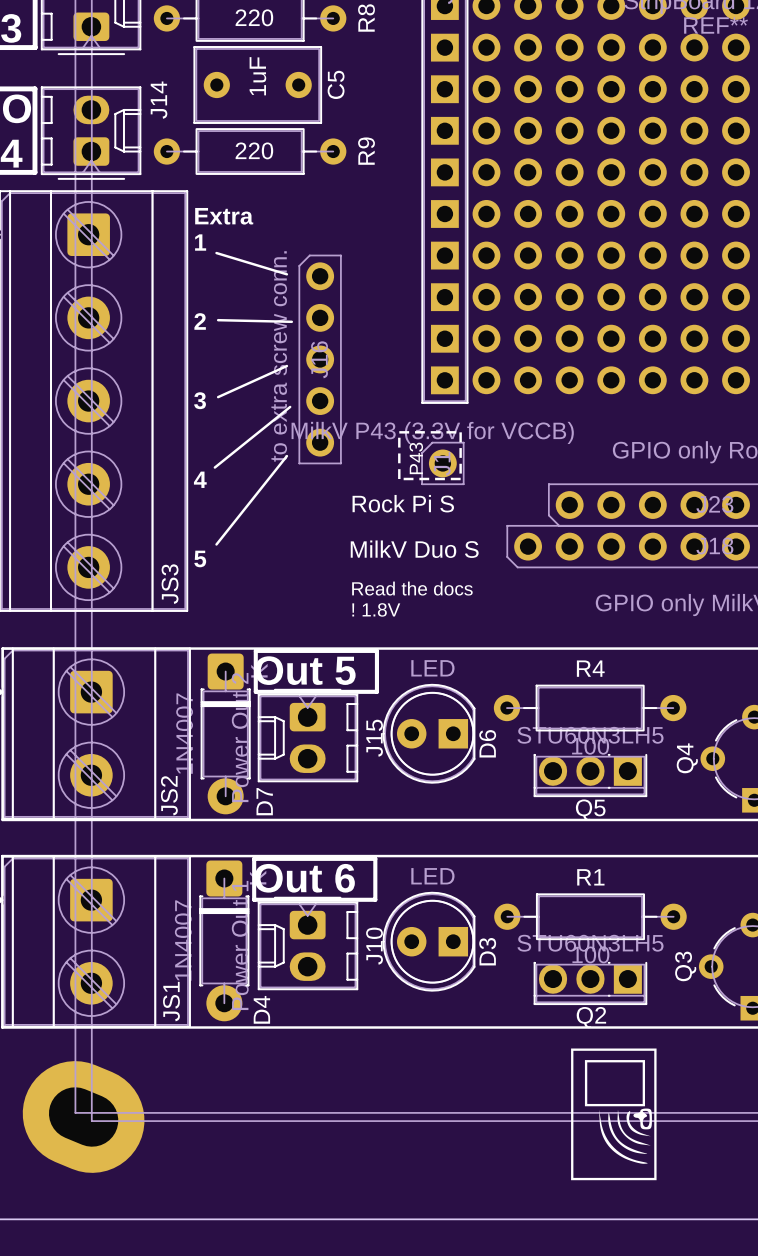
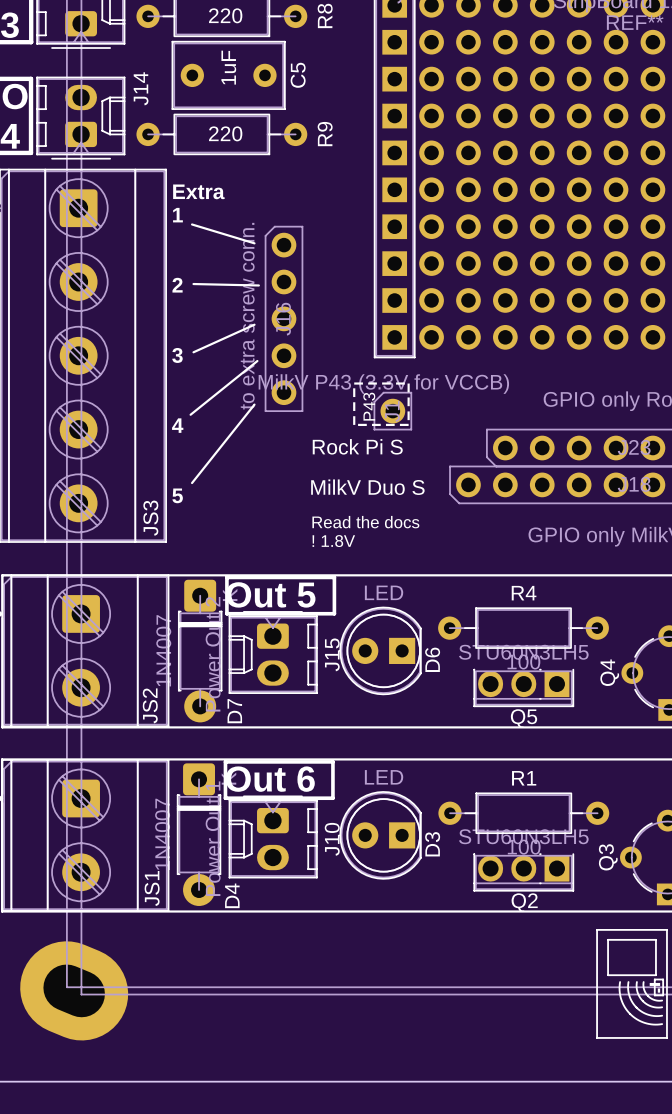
drawing: [571, 1048, 657, 1181] -> none
line: none -> (597, 929) (597, 1037) (666, 1037) (666, 929) (597, 929)
line: none -> (608, 939) (608, 975) (655, 975) (655, 939) (608, 939)
line: none -> (654, 979) (654, 995) (663, 995) (663, 979) (654, 979)
line: none -> (620, 982) (621, 999) (630, 1014) (644, 1022) (662, 1024)
line: none -> (628, 982) (629, 995) (636, 1007) (648, 1014) (662, 1015)
line: none -> (636, 982) (637, 992) (642, 1001) (651, 1006) (662, 1007)
line: none -> (643, 982) (644, 989) (648, 996) (654, 1000) (662, 1000)
drawing: none -> [649, 982, 661, 993]

